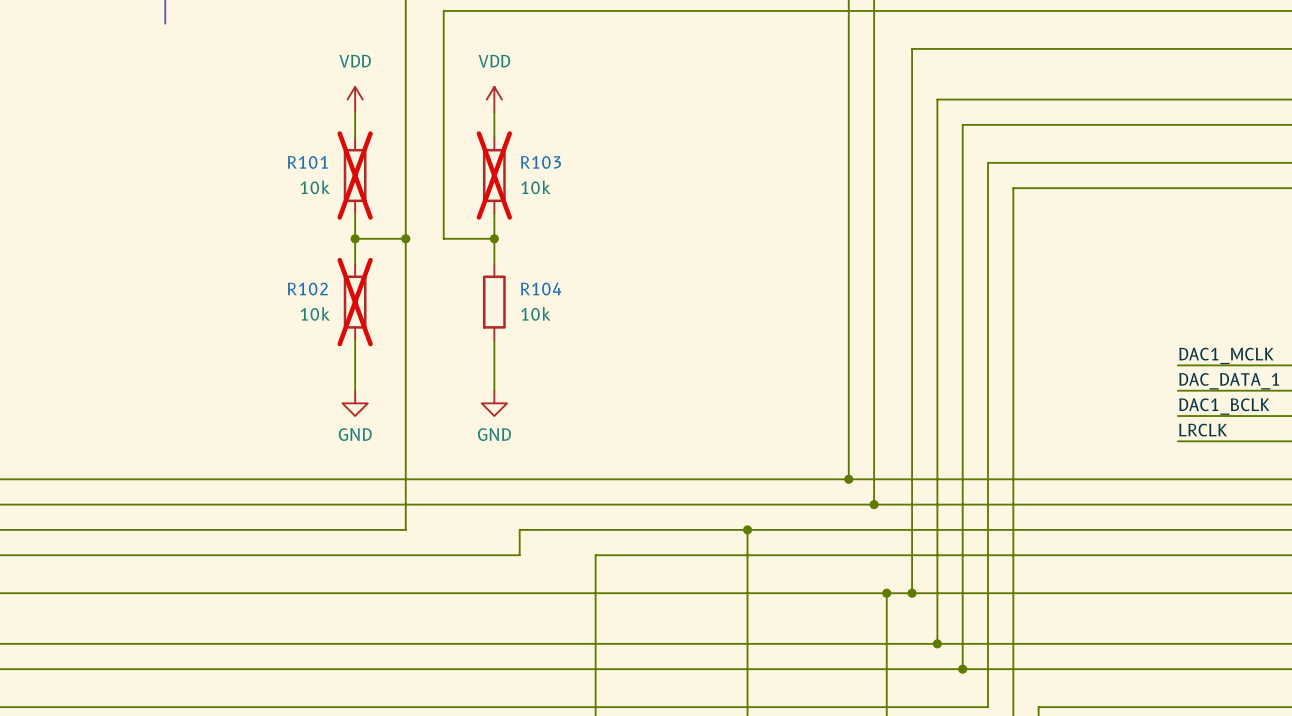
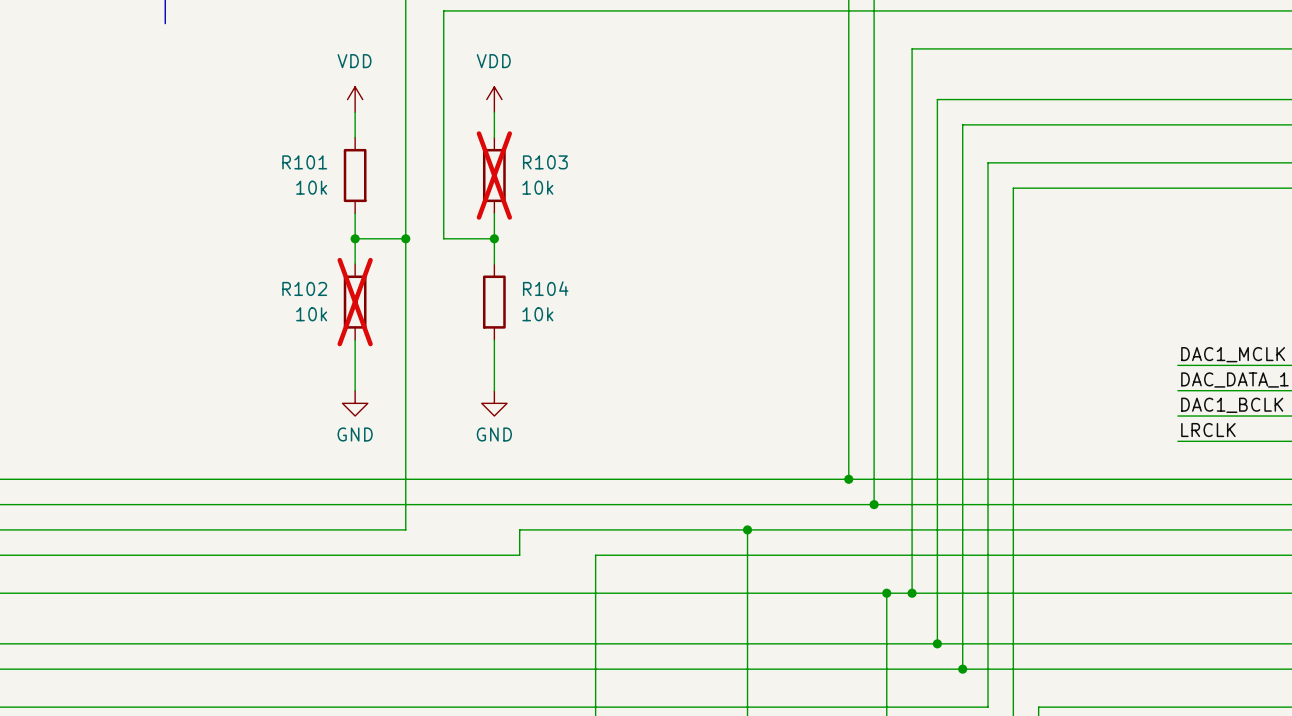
R101 do-not-place cross: (355, 175) -> none

